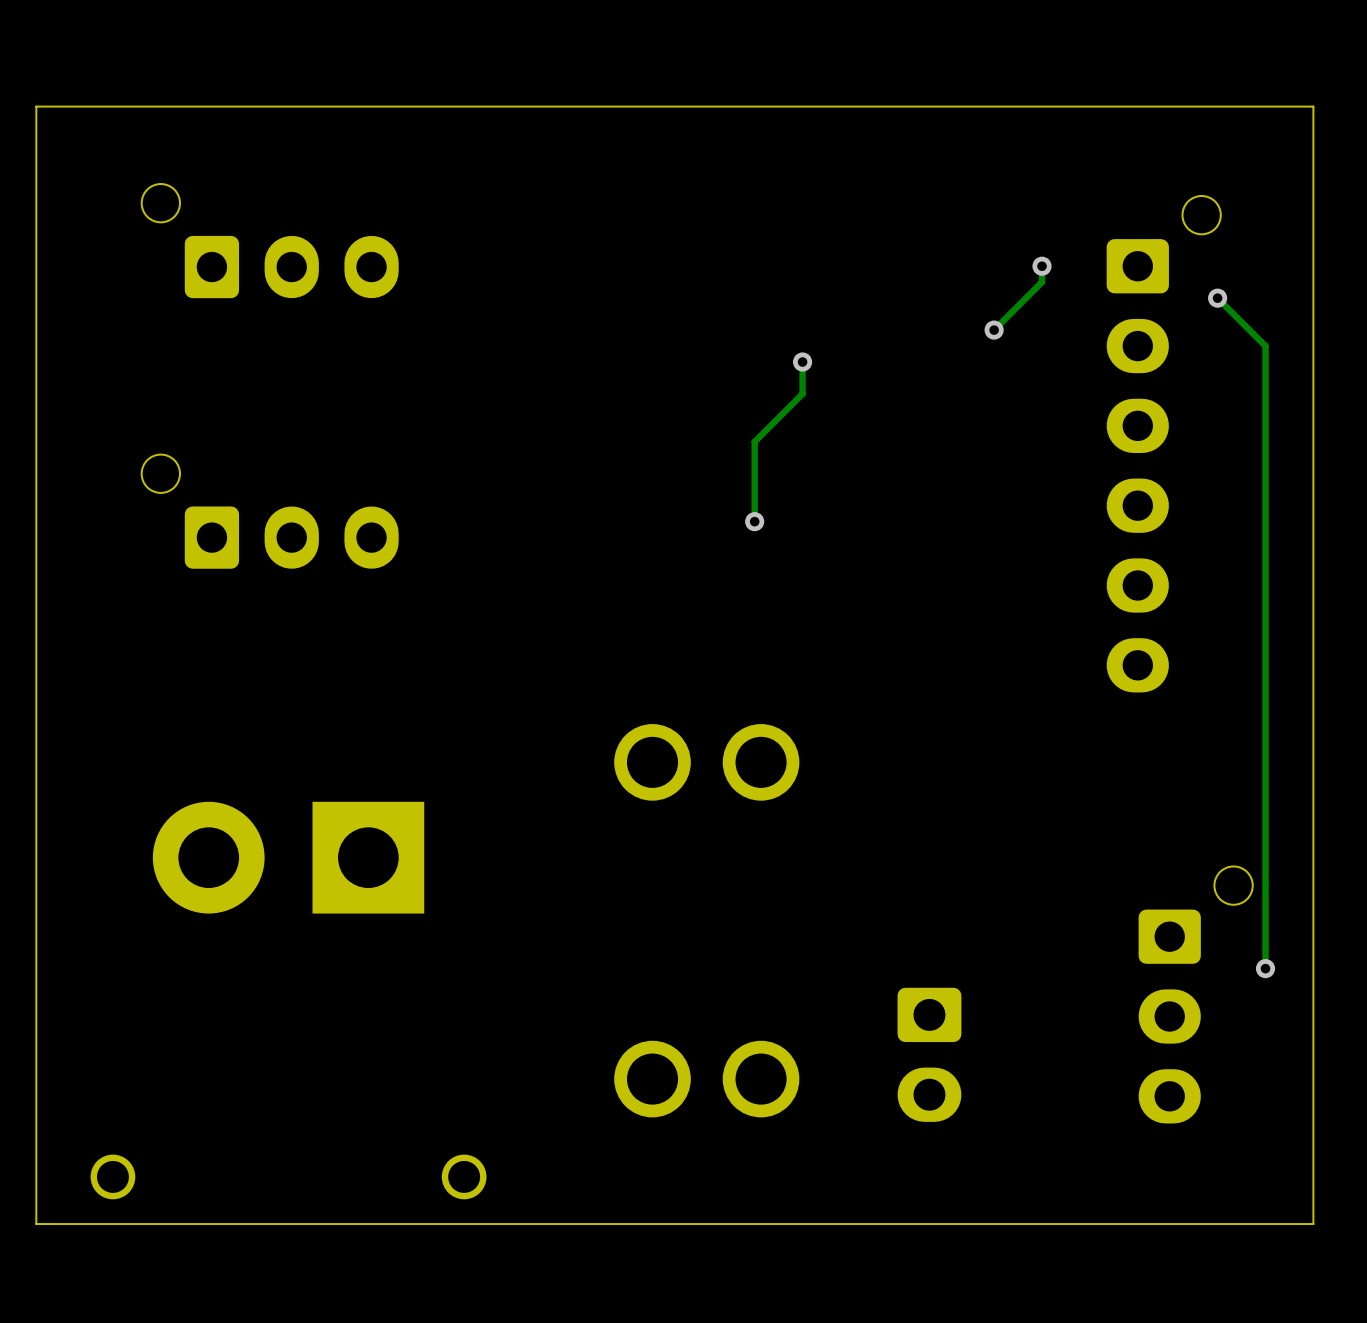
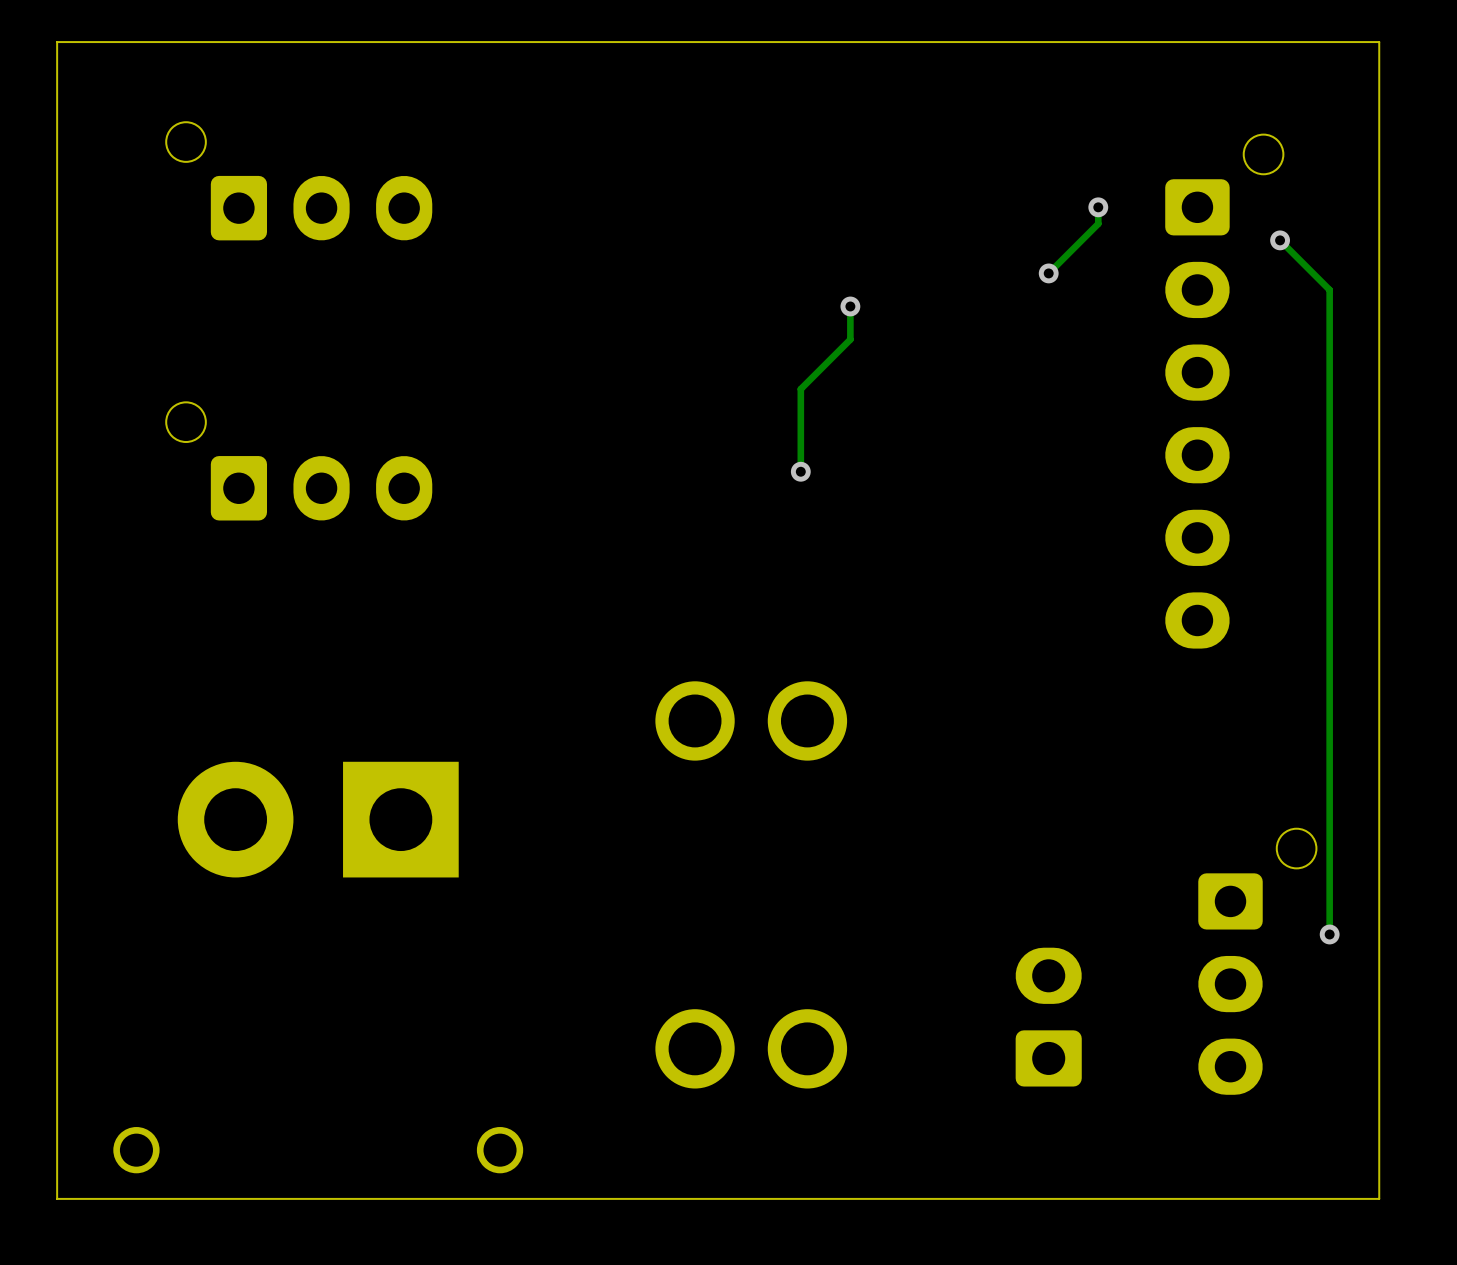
part rotation: 0° (929, 1054) -> 180° (1048, 1017)

